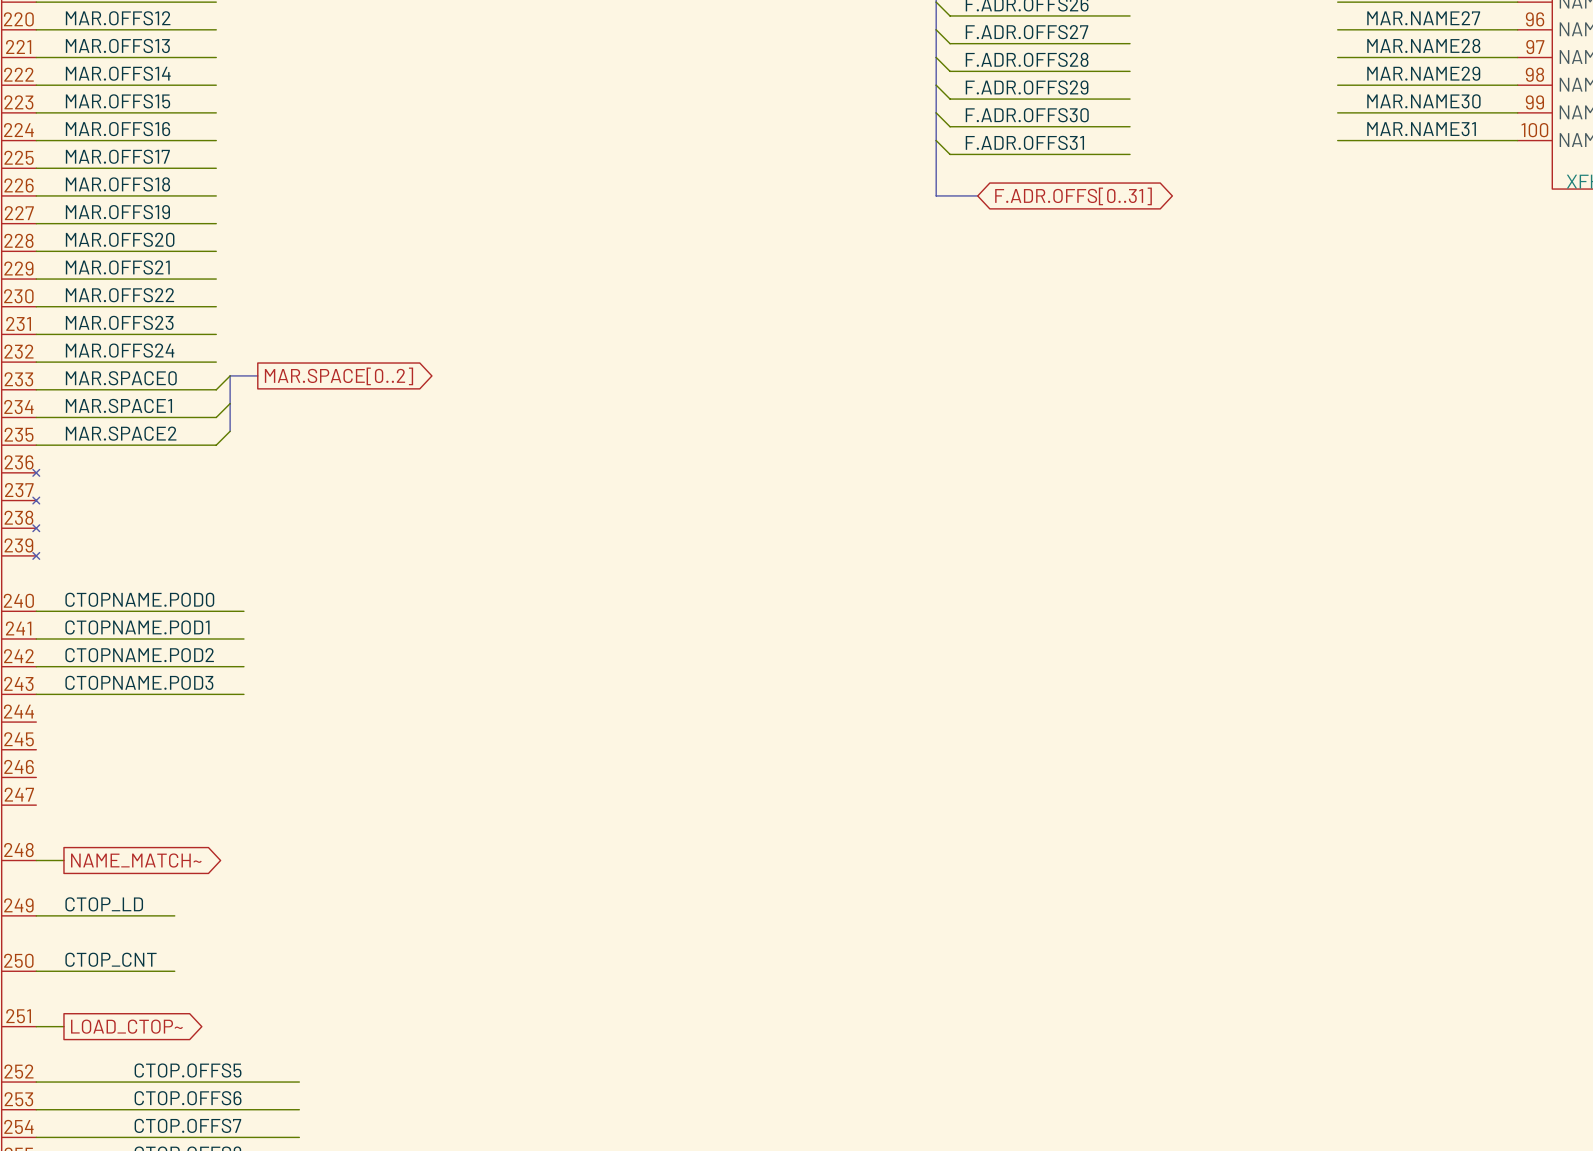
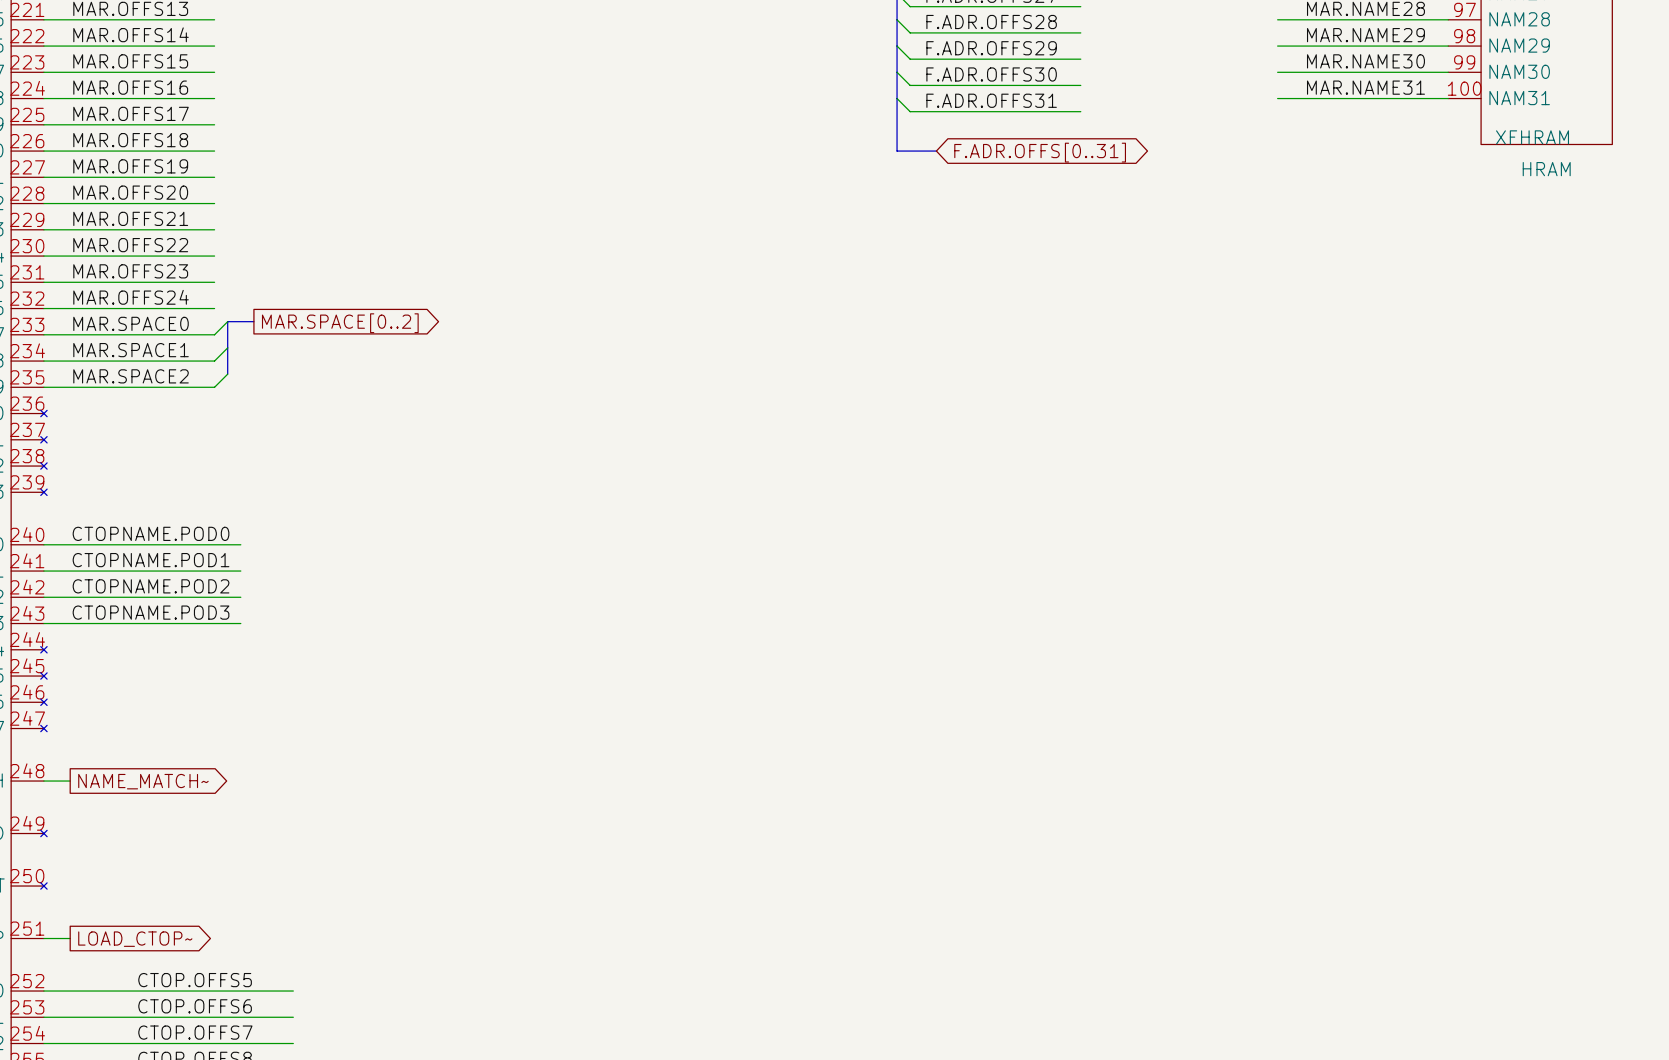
no-connect mark: none -> (43, 649)
no-connect mark: none -> (43, 676)
no-connect mark: none -> (43, 702)
no-connect mark: none -> (43, 728)
label: CTOP_LD (104, 904) -> none
wire: (36, 915) (174, 915) -> none
no-connect mark: none -> (43, 833)
label: CTOP_CNT (111, 959) -> none
wire: (36, 971) (174, 971) -> none
no-connect mark: none -> (43, 886)

